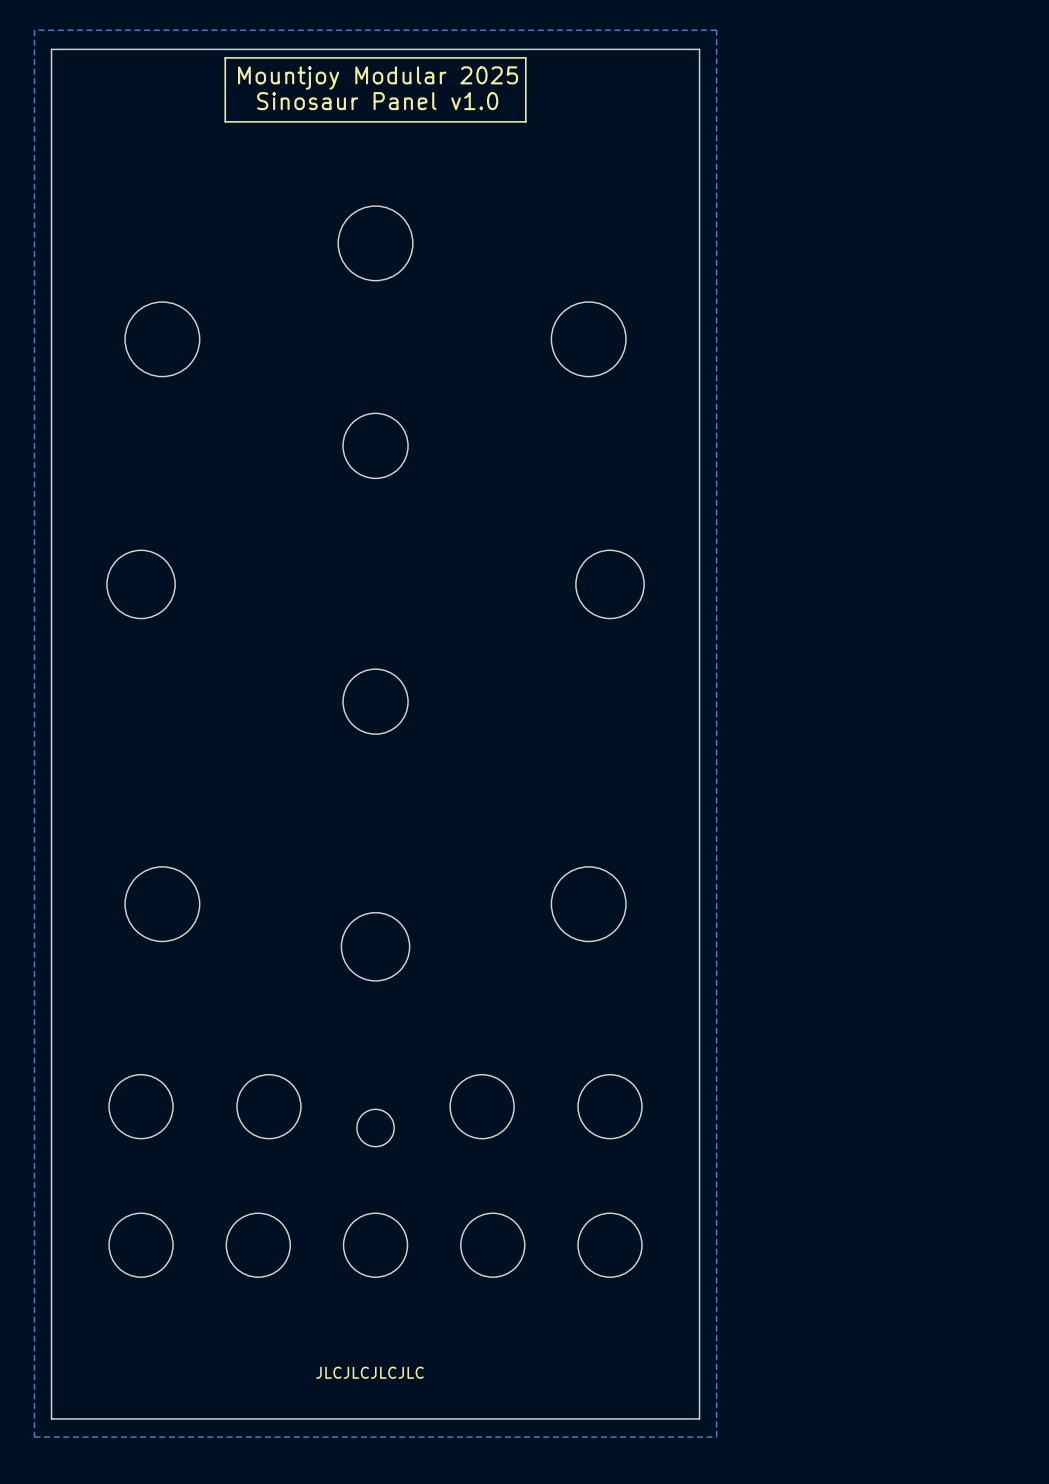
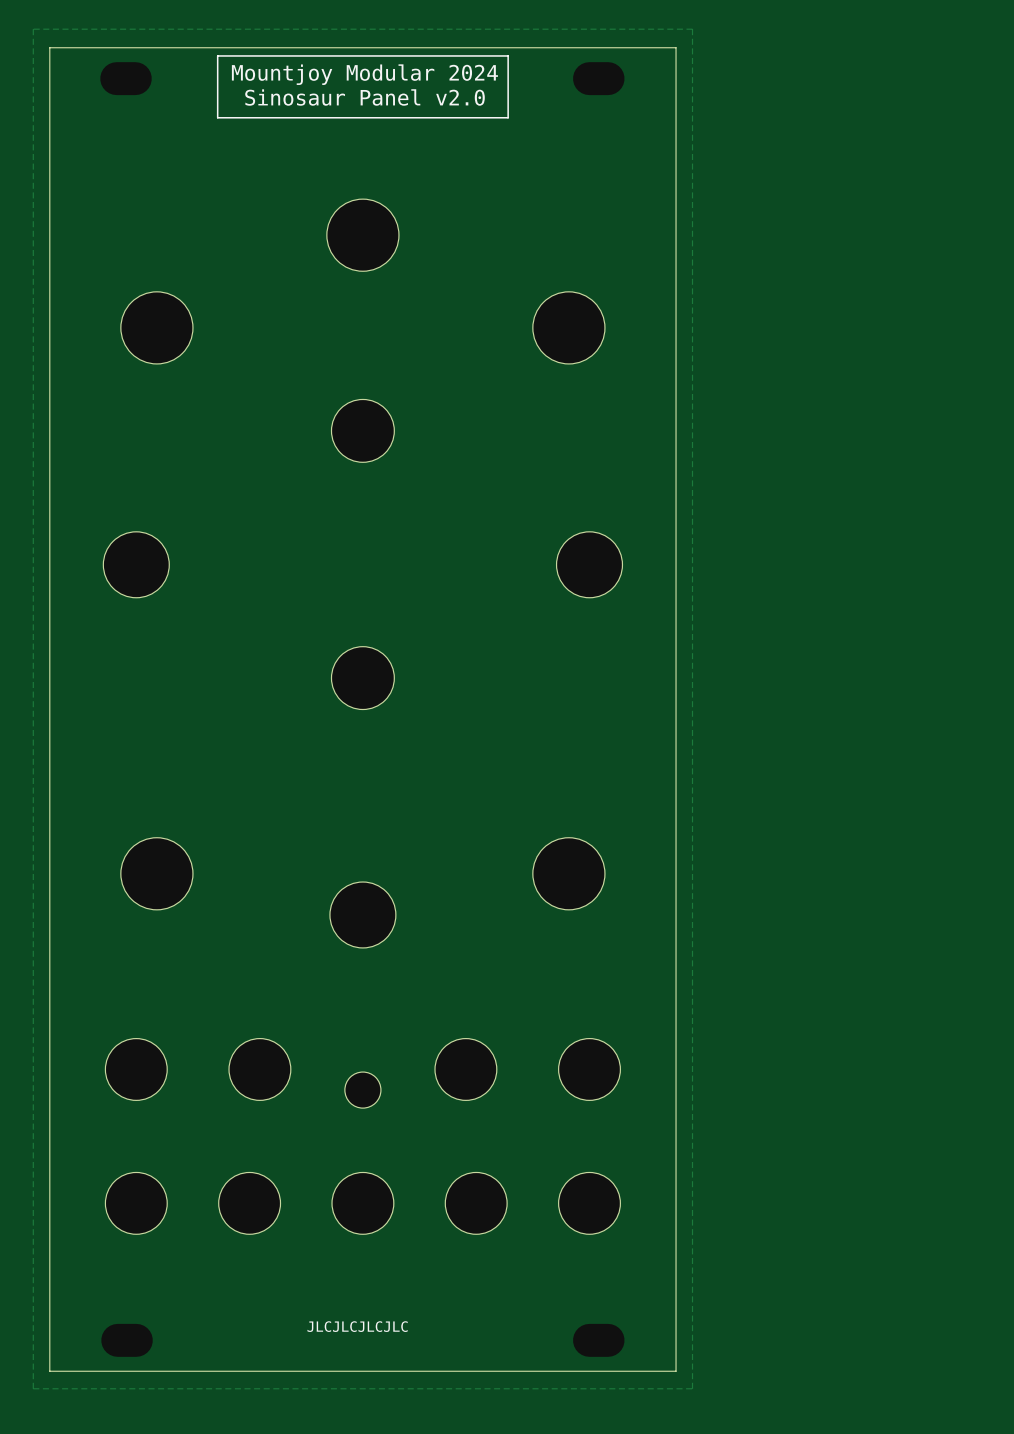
text: Mountjoy Modular 2025 (378, 78) -> Mountjoy Modular 2024 (364, 74)
text: Sinosaur Panel v1.0 (377, 101) -> Sinosaur Panel v2.0 (365, 97)

